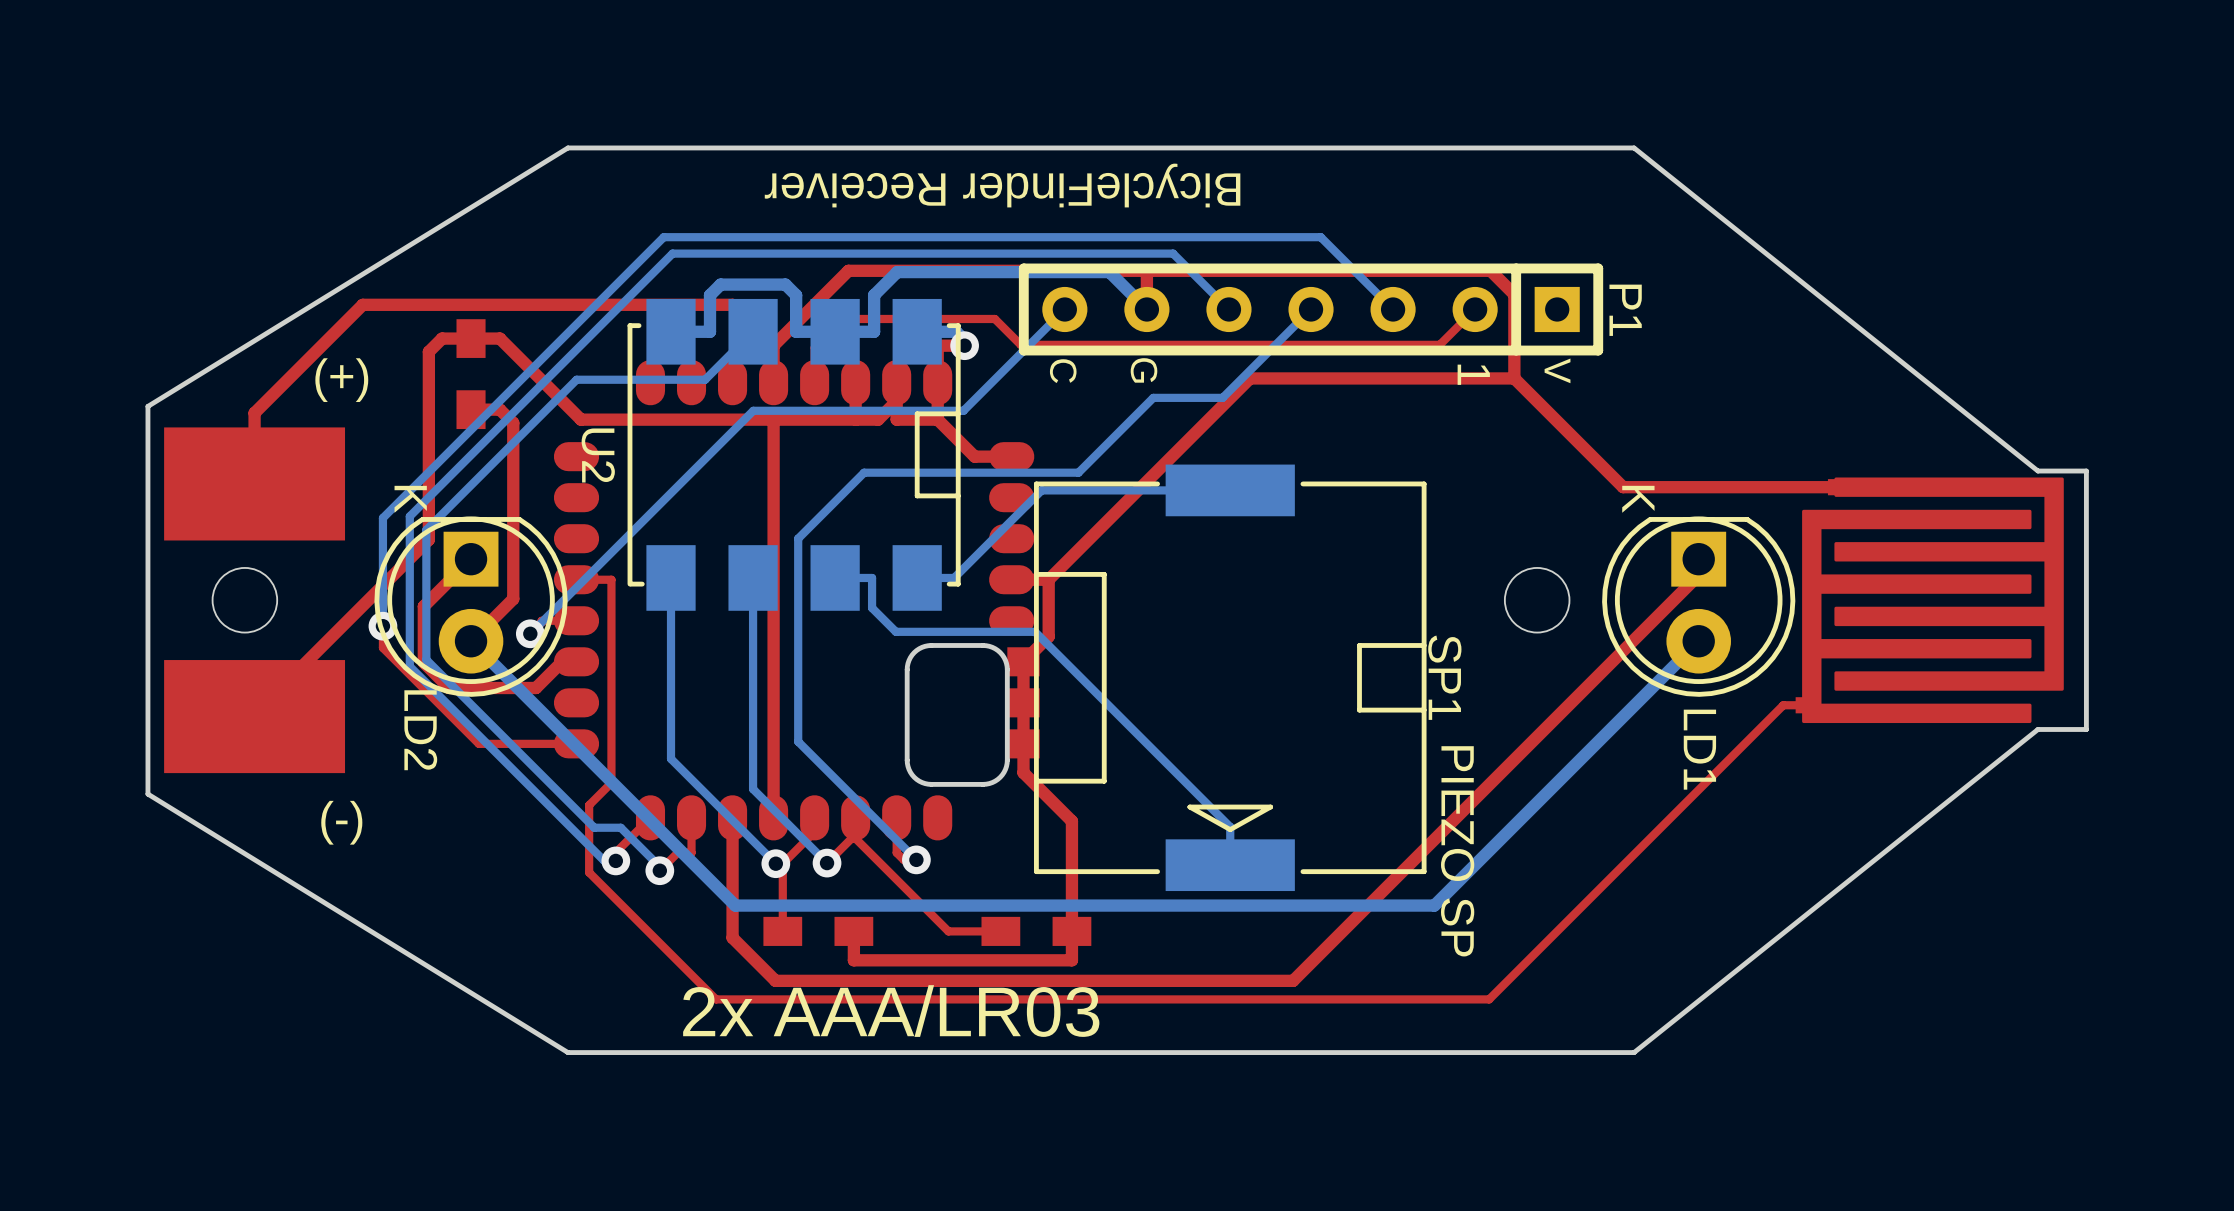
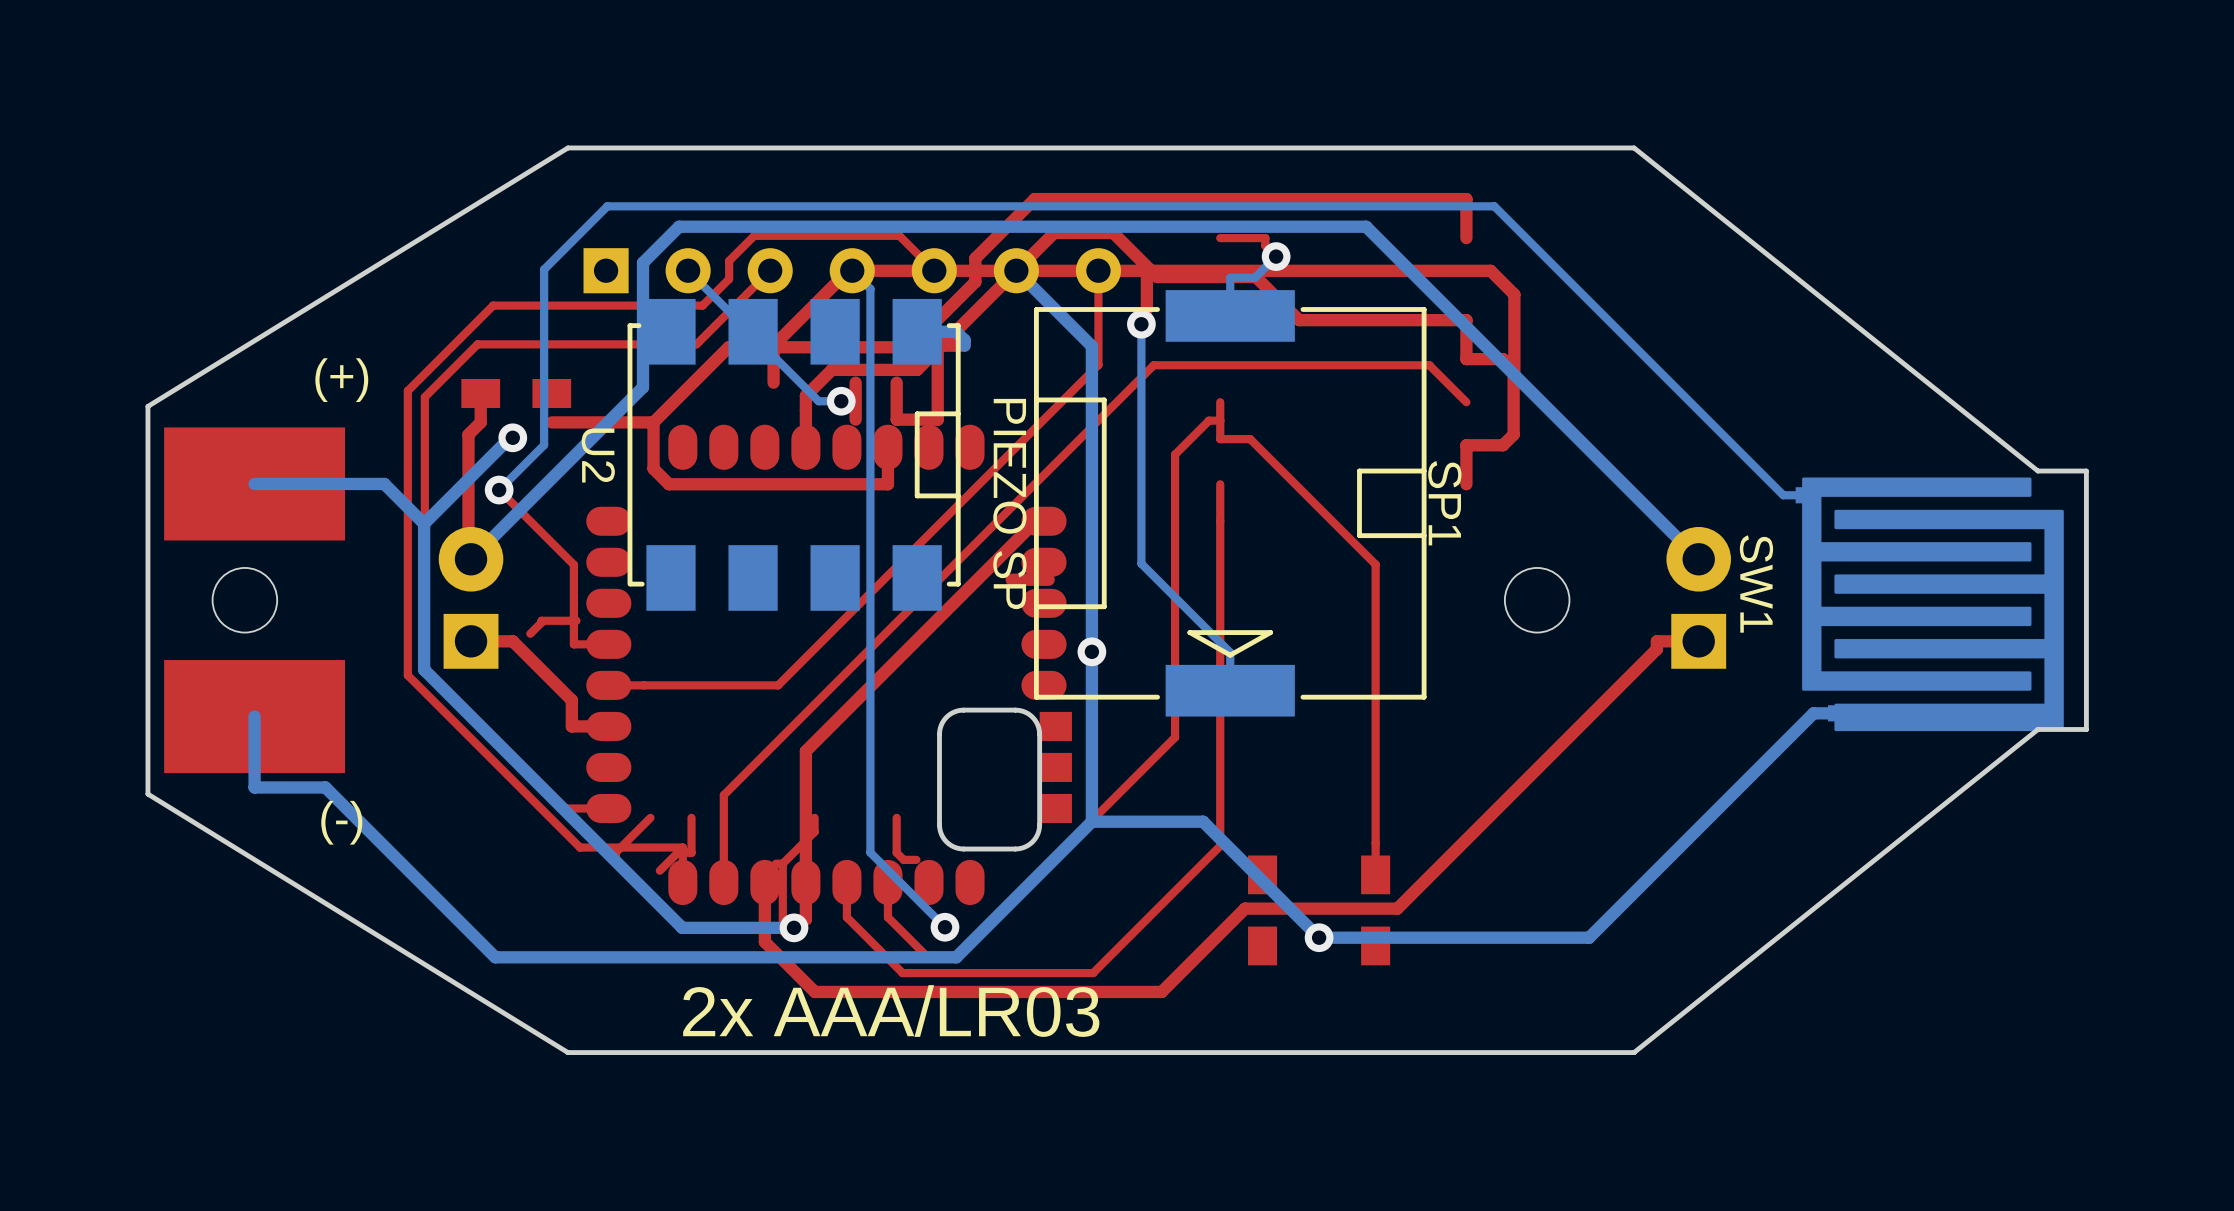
text: BicycleFinder Receiver (1002, 185) -> none
top track: none -> (1220, 238) (1265, 238) (1265, 245) (1276, 256)
top track: none -> (1466, 238) (1466, 199) (1034, 199) (975, 258) (975, 281) (910, 347) (728, 347) (653, 422)
bottom track: none -> (1276, 256) (1254, 277) (1230, 277) (1230, 315)
via: none -> (1276, 256)
bottom track: none -> (688, 270) (818, 401) (841, 401)
top track: none -> (770, 270) (696, 344) (477, 344) (424, 397) (424, 667) (565, 808) (608, 808)
bottom track: none -> (852, 270) (870, 288) (870, 852) (945, 927)
top track: none -> (934, 270) (899, 235) (754, 235) (729, 260) (729, 279) (702, 305) (493, 305) (407, 390) (407, 675) (580, 847) (682, 847) (682, 882)
bottom track: none -> (1016, 270) (1091, 346) (1091, 821)
top track: none -> (1098, 270) (1098, 365) (778, 685) (608, 685)
bottom track: (1064, 309) (963, 410) (753, 410) (530, 633) -> none
bottom track: (1146, 309) (1109, 272) (897, 272) (874, 295) (874, 331) (796, 331) (796, 295) (785, 284) (720, 284) (710, 295) (710, 331) (671, 331) -> none
bottom track: (1228, 309) (1173, 253) (672, 253) (409, 516) (409, 666) (604, 860) (615, 860) -> none
bottom track: (1311, 309) (1222, 397) (1153, 397) (1078, 472) (864, 472) (798, 538) (798, 741) (916, 859) -> none
P1 side: bottom (1311, 309) -> top (852, 270)
bottom track: (1393, 309) (1320, 237) (663, 237) (382, 518) (382, 626) -> none
top track: (1475, 309) (1439, 344) (1020, 344) (994, 318) (843, 318) (814, 347) (814, 382) -> none
bottom track: none -> (1141, 324) (1141, 563) (1230, 652) (1230, 690)
via: none -> (1141, 324)
bottom track: (753, 331) (705, 379) (576, 379) (426, 530) (426, 659) (594, 827) (620, 827) (659, 866) (659, 870) -> none
top track: (773, 345) (732, 304) (362, 304) (254, 413) (254, 483) -> none
via: (964, 345) -> none
part rotation: 0° (471, 374) -> 90° clockwise (516, 393)
via: none -> (841, 401)
top track: (896, 401) (878, 419) (581, 419) (499, 338) (442, 338) (428, 351) (428, 539) (254, 713) (254, 716) -> none
top track: none -> (1220, 402) (1220, 439) (1250, 439) (1375, 564) (1375, 874)
top track: none -> (1466, 402) (1429, 365) (1153, 365) (723, 795) (723, 882)
top track: (471, 409) (499, 409) (513, 422) (513, 598) (471, 641) -> (608, 726) (571, 726) (571, 700) (512, 641) (471, 641)
top track: (773, 419) (773, 817) -> none
top track: (937, 419) (974, 456) (1011, 456) -> none
top track: none -> (1220, 420) (1208, 420) (1175, 454) (1175, 737) (956, 955) (926, 955) (887, 917) (887, 882)
top track: none -> (653, 422) (653, 468) (669, 484) (887, 484) (887, 447)
top track: none -> (653, 422) (551, 422)
bottom track: none -> (512, 437) (510, 437) (424, 523)
via: none -> (512, 437)
top track: none -> (805, 447) (805, 395) (831, 369) (917, 369) (1054, 232) (1113, 232) (1157, 277) (1256, 277) (1299, 320) (1466, 320) (1466, 359) (1502, 359) (1513, 369) (1513, 434) (1502, 445) (1466, 445) (1466, 484)
bottom track: none -> (254, 483) (384, 483) (424, 523)
top track: none -> (1220, 484) (1220, 845) (1093, 973) (902, 973) (846, 917) (846, 882)
top track: (1836, 487) (1623, 487) (1514, 378) (1249, 378) (1048, 579) (1048, 636) (1023, 661) (1023, 772) (1071, 821) (1071, 960) (853, 960) (853, 931) -> none
top track: none -> (499, 490) (573, 564) (573, 644) (608, 644)
bottom track: none -> (499, 490) (544, 445) (544, 269) (607, 206) (1494, 206) (1783, 495) (1803, 495)
via: none -> (499, 490)
bottom track: (1230, 490) (1041, 490) (954, 577) (917, 577) -> none
top track: none -> (1044, 521) (1035, 521) (805, 751) (805, 919) (802, 919) (794, 927)
bottom track: none -> (424, 523) (424, 669) (682, 927) (794, 927)
top track: (471, 559) (423, 606) (423, 662) (449, 687) (536, 687) (562, 661) (576, 661) -> (471, 559) (468, 556) (468, 434) (480, 422) (480, 393)
top track: (1698, 559) (1698, 575) (1293, 980) (775, 980) (732, 937) (732, 817) -> none
bottom track: none -> (1698, 559) (1366, 226) (679, 226) (643, 262) (643, 387) (471, 559)
bottom track: (671, 577) (671, 758) (775, 863) -> none
bottom track: (753, 577) (753, 789) (827, 863) -> none
bottom track: (835, 577) (872, 577) (872, 607) (895, 631) (1035, 631) (1230, 827) (1230, 865) -> none
top track: (576, 579) (611, 579) (611, 782) (589, 805) (589, 872) (716, 999) (1489, 999) (1783, 705) (1803, 705) -> none
part position: (796, 600) -> (829, 664)
SW1 side: top (1929, 600) -> bottom (1929, 604)
LD2 side: bottom (471, 606) -> top (471, 597)
LD1 side: bottom (1698, 606) -> top (1698, 597)
top track: (382, 626) (382, 647) (478, 743) (576, 743) -> none
via: (382, 626) -> none
via: (530, 633) -> none
top track: none -> (1698, 641) (1656, 641) (1656, 649) (1397, 908) (1245, 908) (1161, 991) (814, 991) (764, 941) (764, 882)
bottom track: (1698, 641) (1434, 905) (735, 905) (471, 641) -> none
via: none -> (1091, 651)
SP1 position: (1230, 677) -> (1230, 503)
bottom track: none -> (1836, 713) (1813, 713) (1589, 937) (1319, 937) (1203, 821) (1091, 821)
bottom track: none -> (254, 716) (254, 787) (325, 787) (495, 957) (956, 957) (1091, 821)
top track: (855, 838) (851, 838) (827, 863) -> none
top track: (855, 838) (948, 931) (1000, 931) -> none
SP1 value position: PIEZO SP (1457, 851) -> PIEZO SP (1009, 504)
via: (916, 859) -> none
via: (615, 860) -> none
via: (775, 863) -> none
via: (827, 863) -> none
via: (659, 870) -> none
part: none -> (1262, 910)
part: none -> (1375, 910)
via: none -> (794, 927)
via: none -> (945, 927)
part: (818, 931) -> none
part: (1036, 931) -> none
via: none -> (1319, 937)

